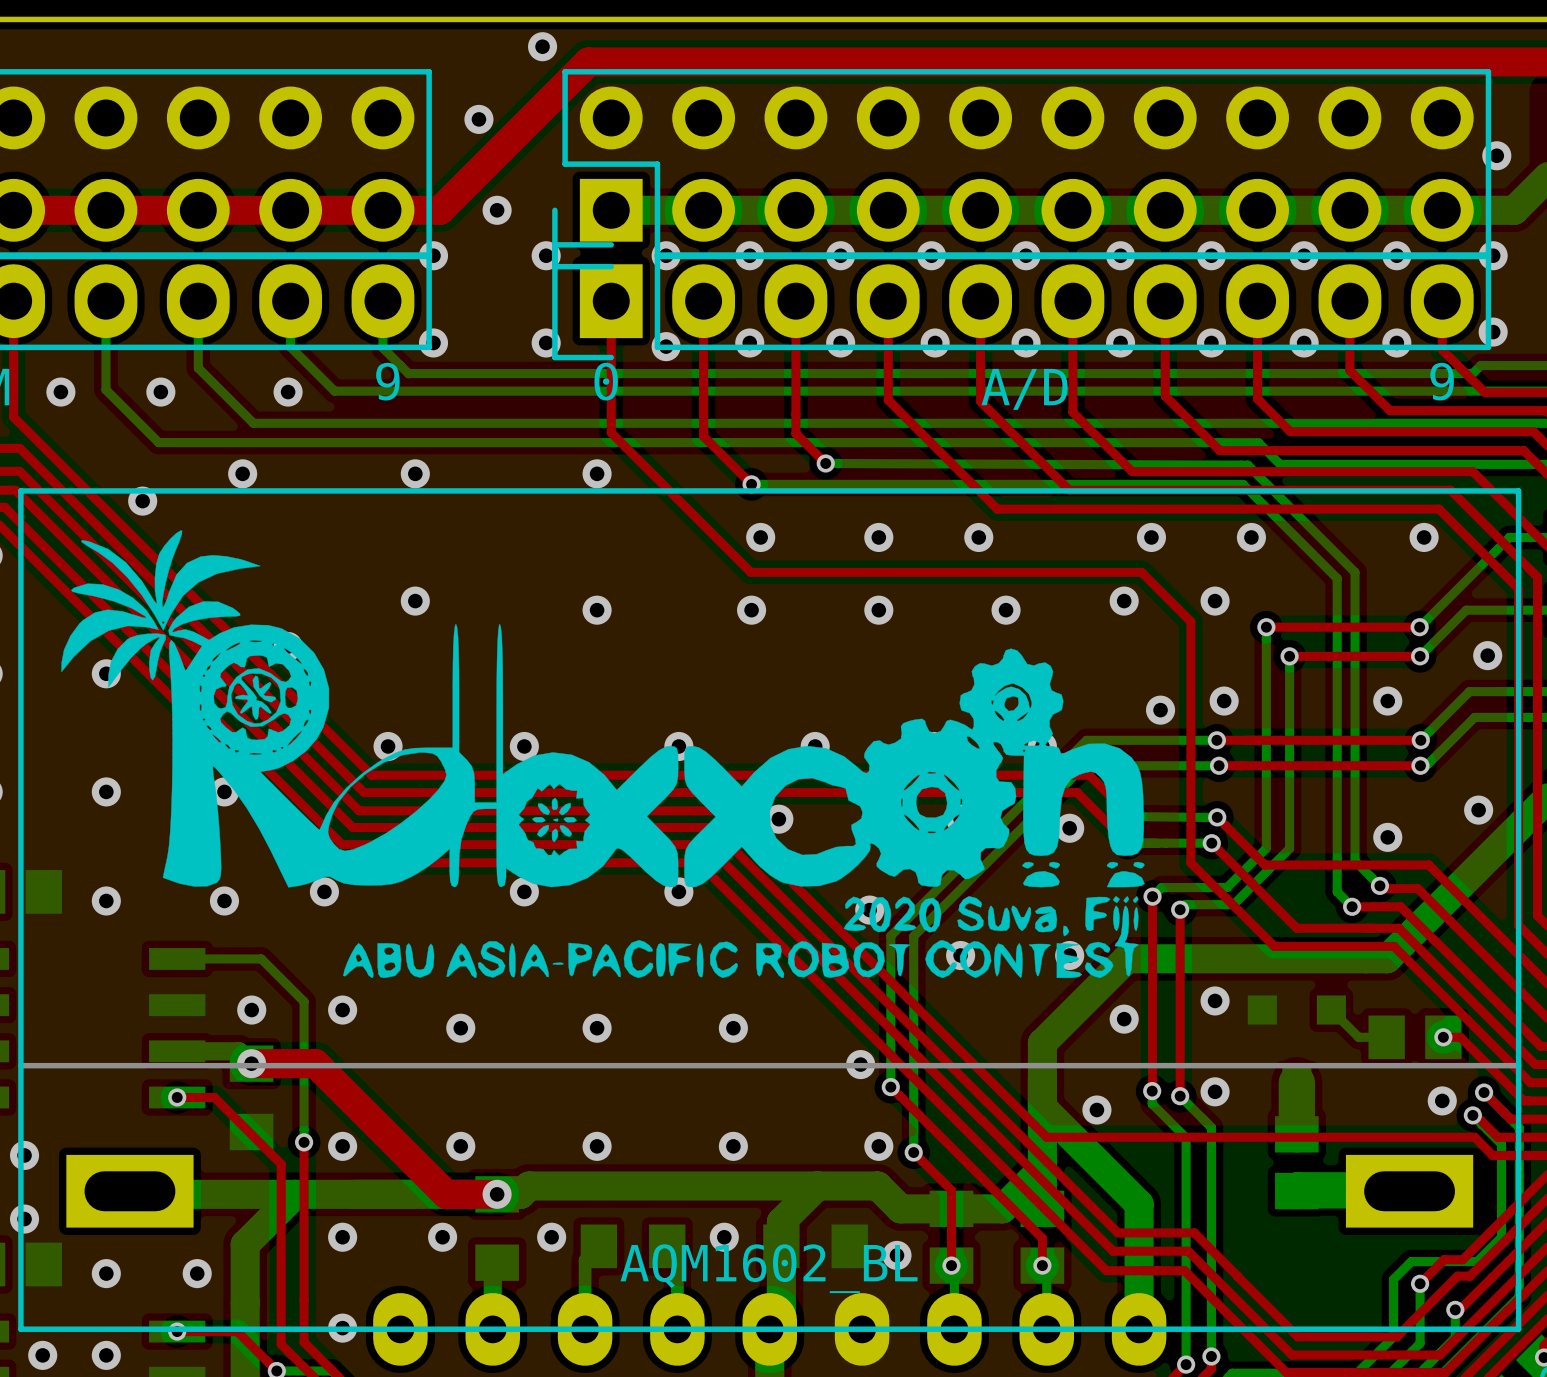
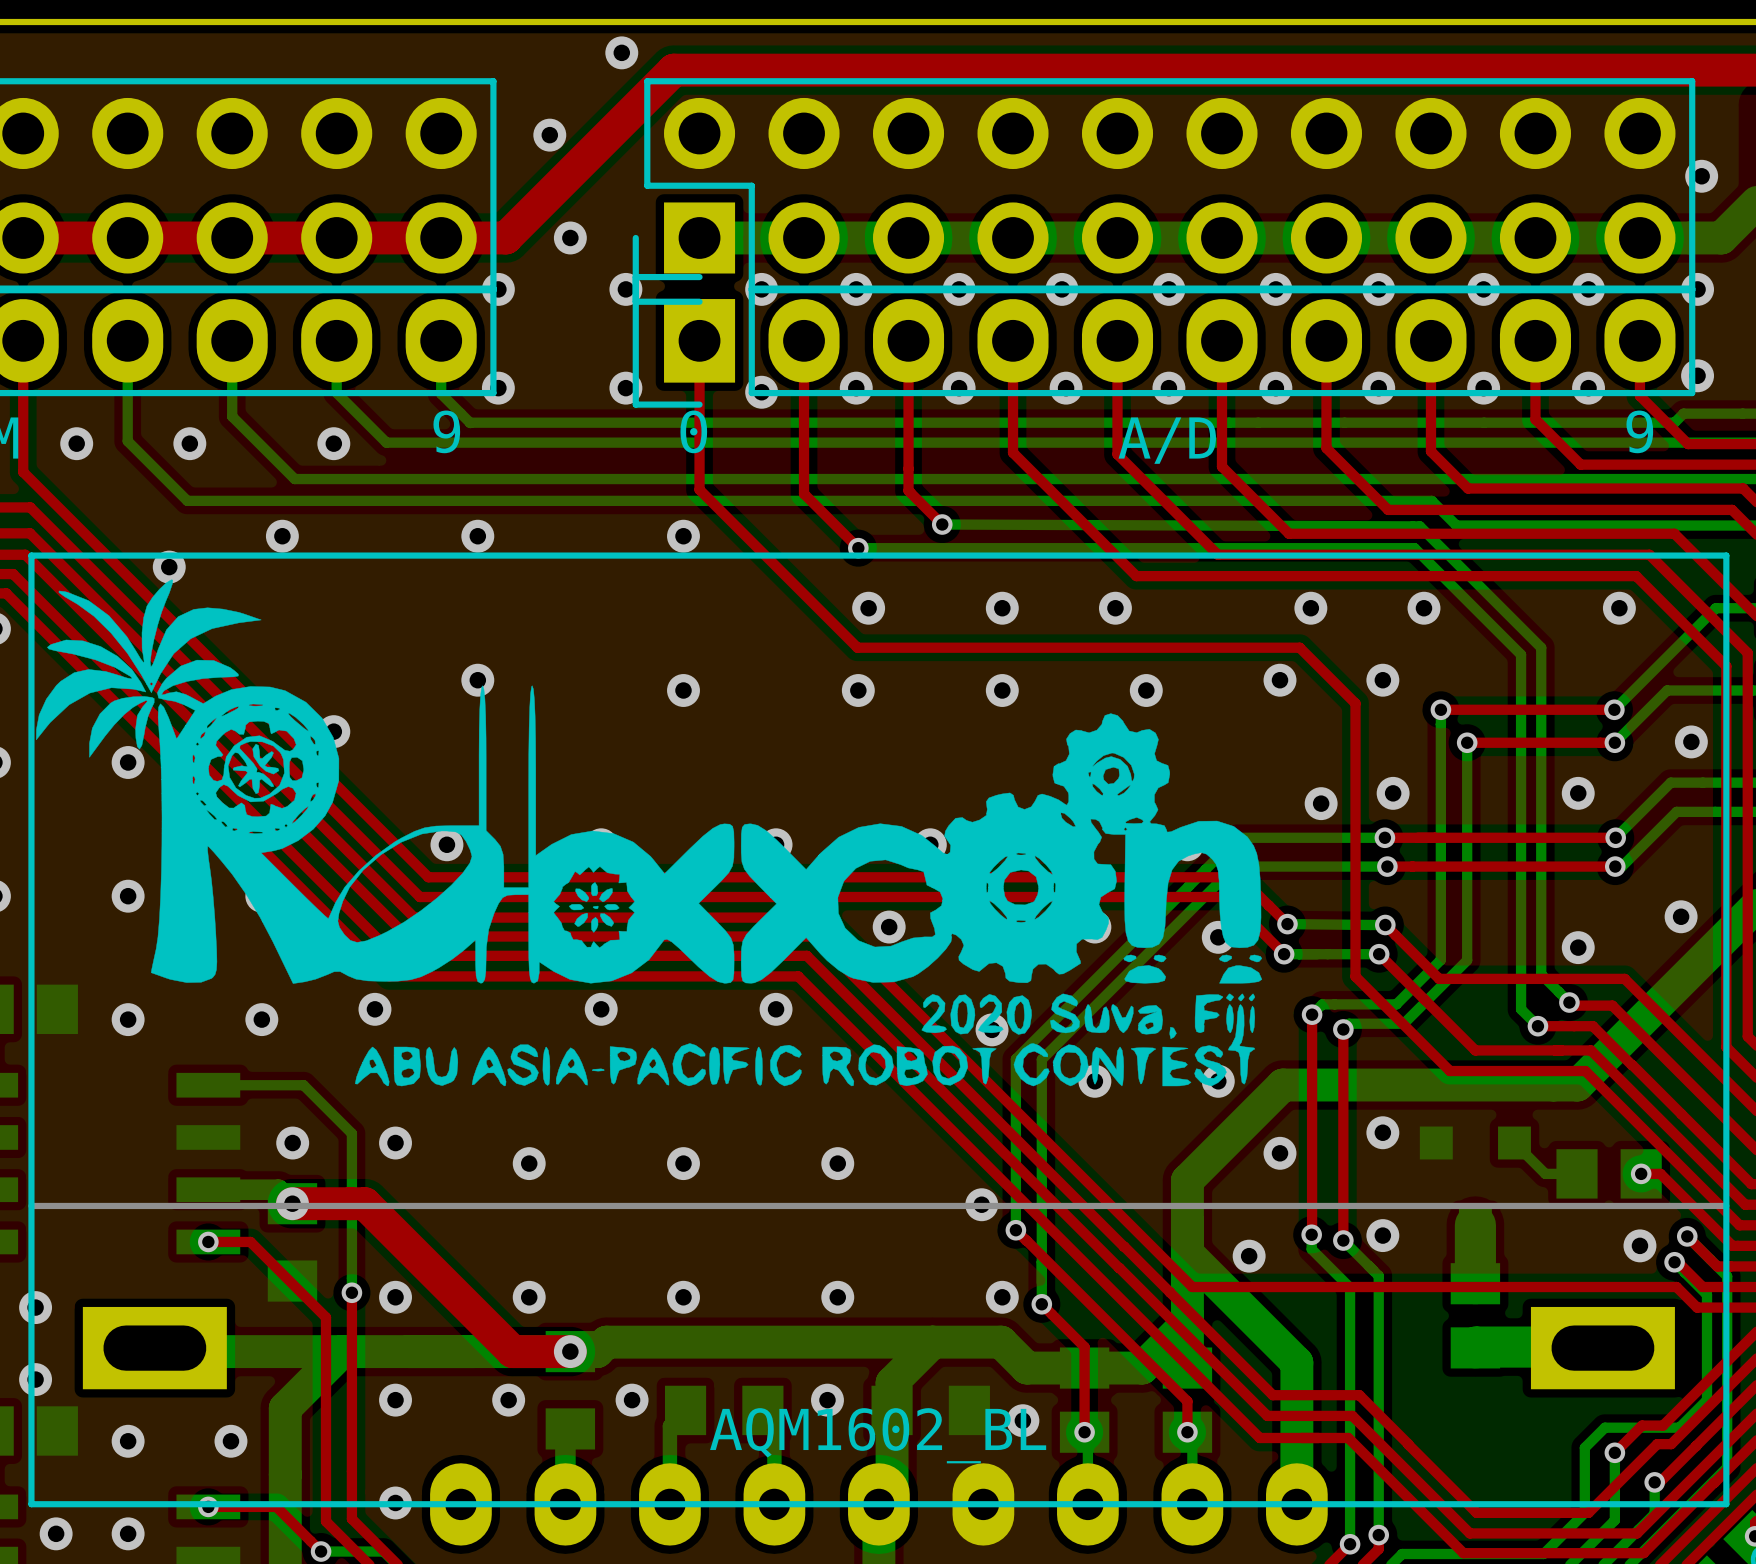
drawing position: (603, 754) -> (649, 832)

